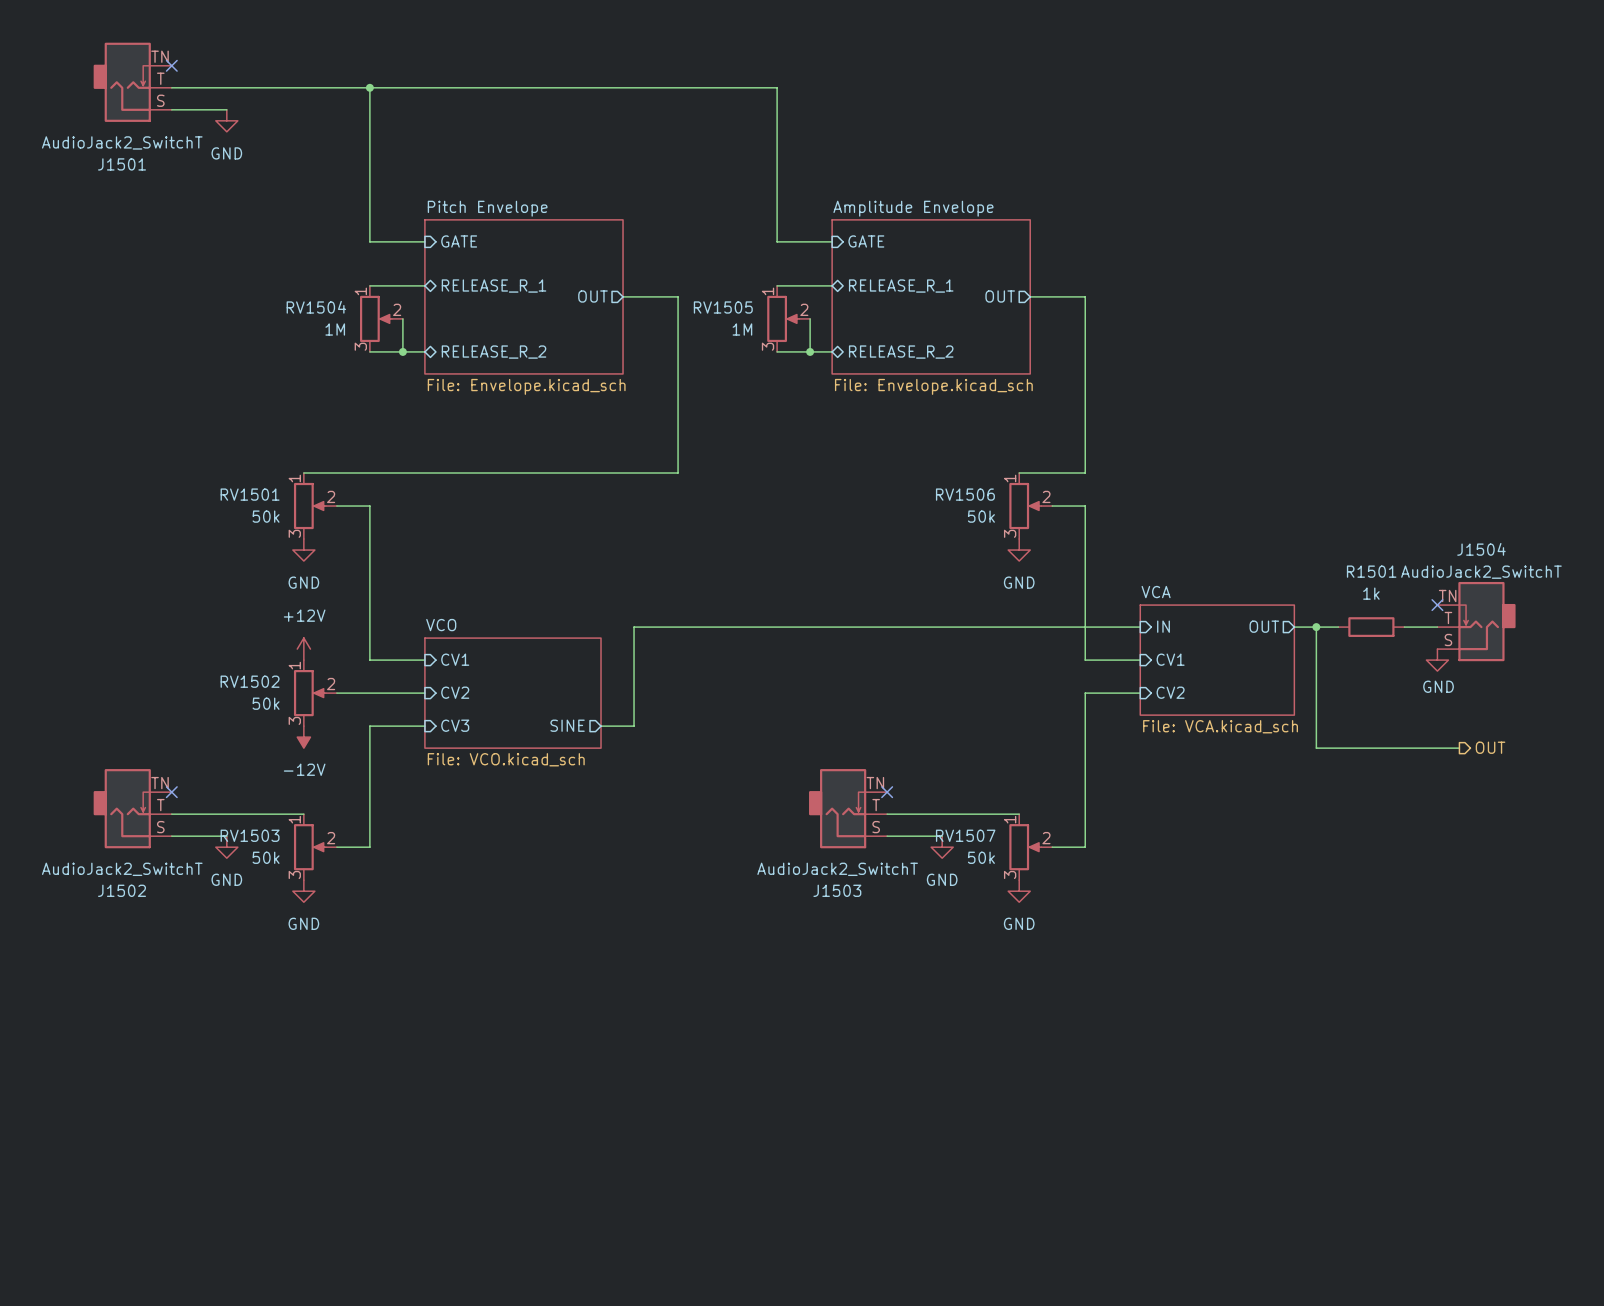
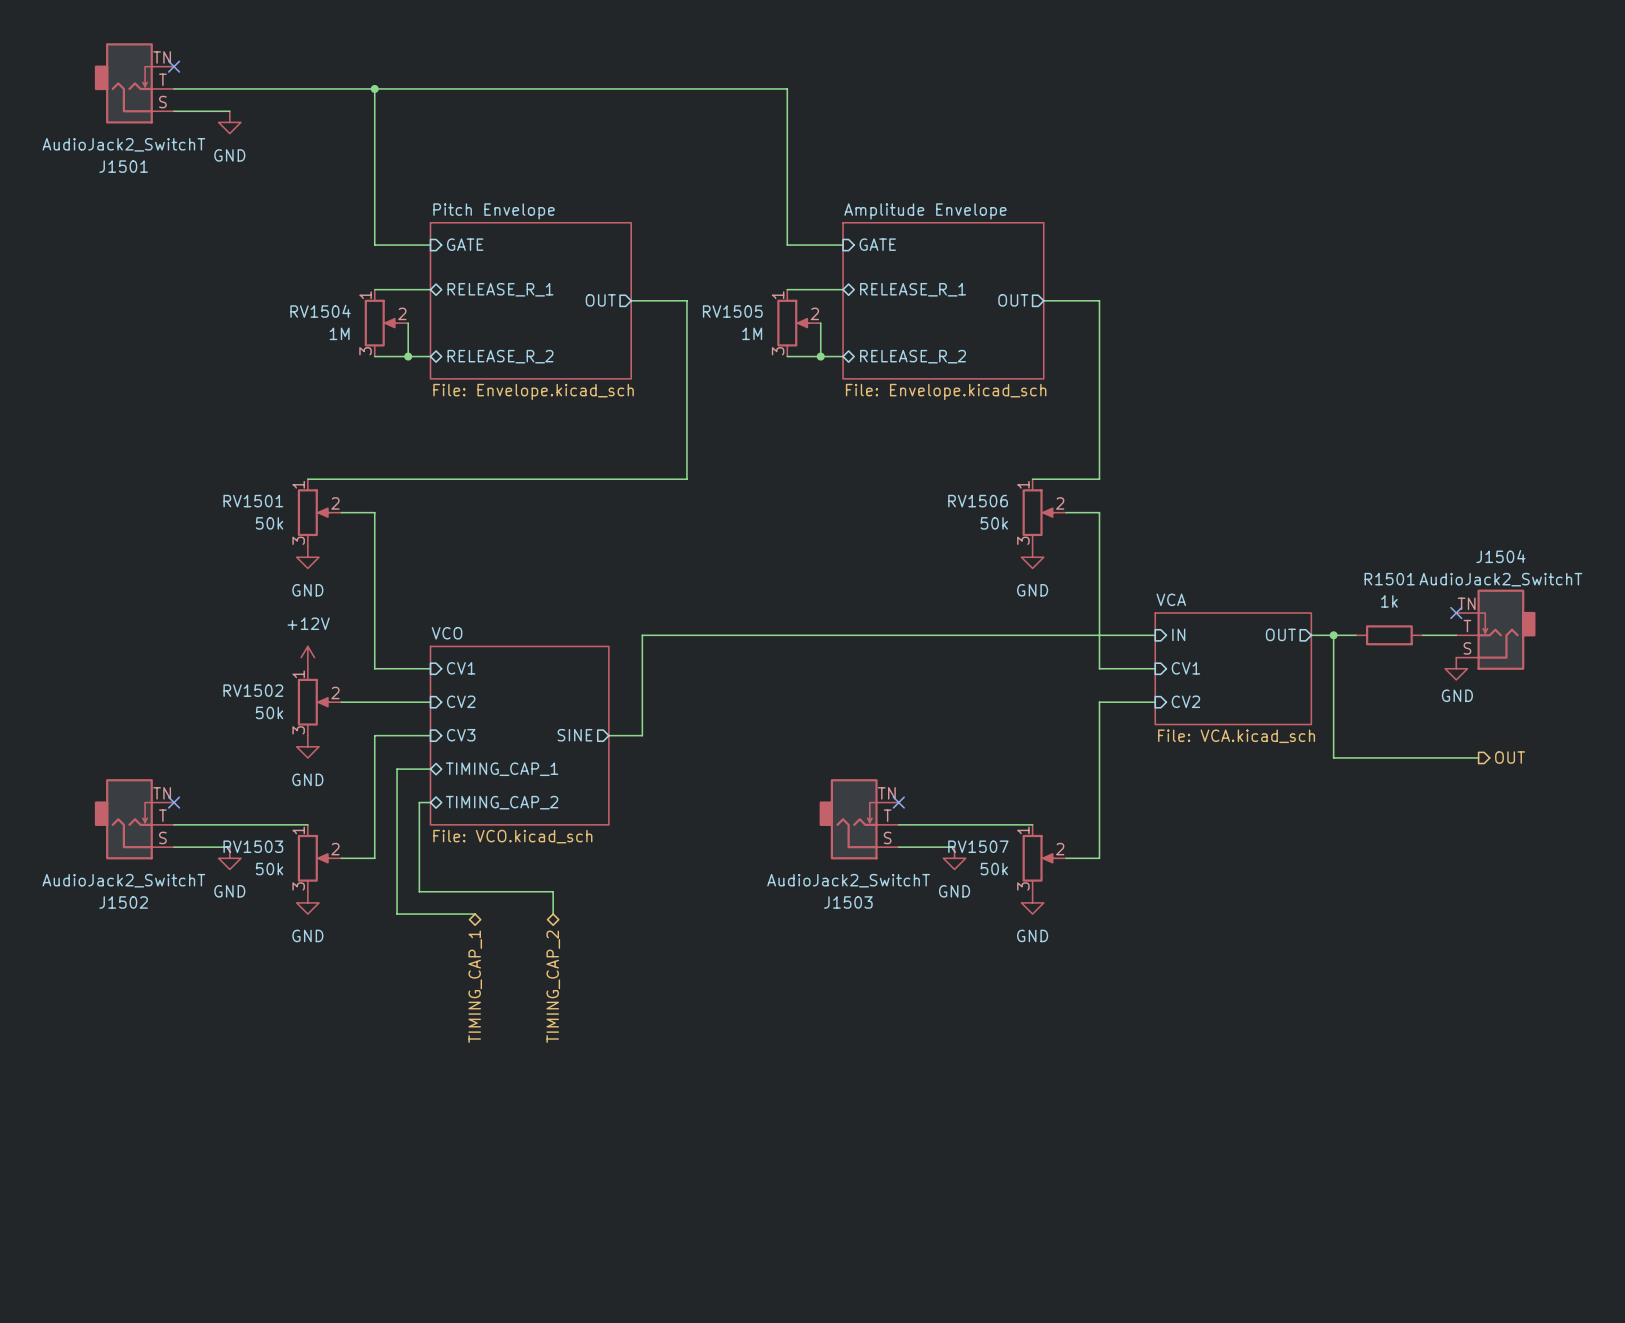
sheet VCO: File: VCO.kicad_sch (512, 693) -> none
sheet VCO: none -> File: VCO.kicad_sch (519, 735)
power symbol: -12V (303, 737) -> GND (307, 746)
wire: none -> (430, 769) (397, 769) (397, 914) (475, 914)
sheet pin: none -> TIMING_CAP_1 (502, 769)
wire: none -> (430, 802) (419, 802) (419, 891) (553, 891) (553, 914)
sheet pin: none -> TIMING_CAP_2 (502, 802)
hierarchical label: none -> TIMING_CAP_1 (475, 986)
hierarchical label: none -> TIMING_CAP_2 (553, 986)

